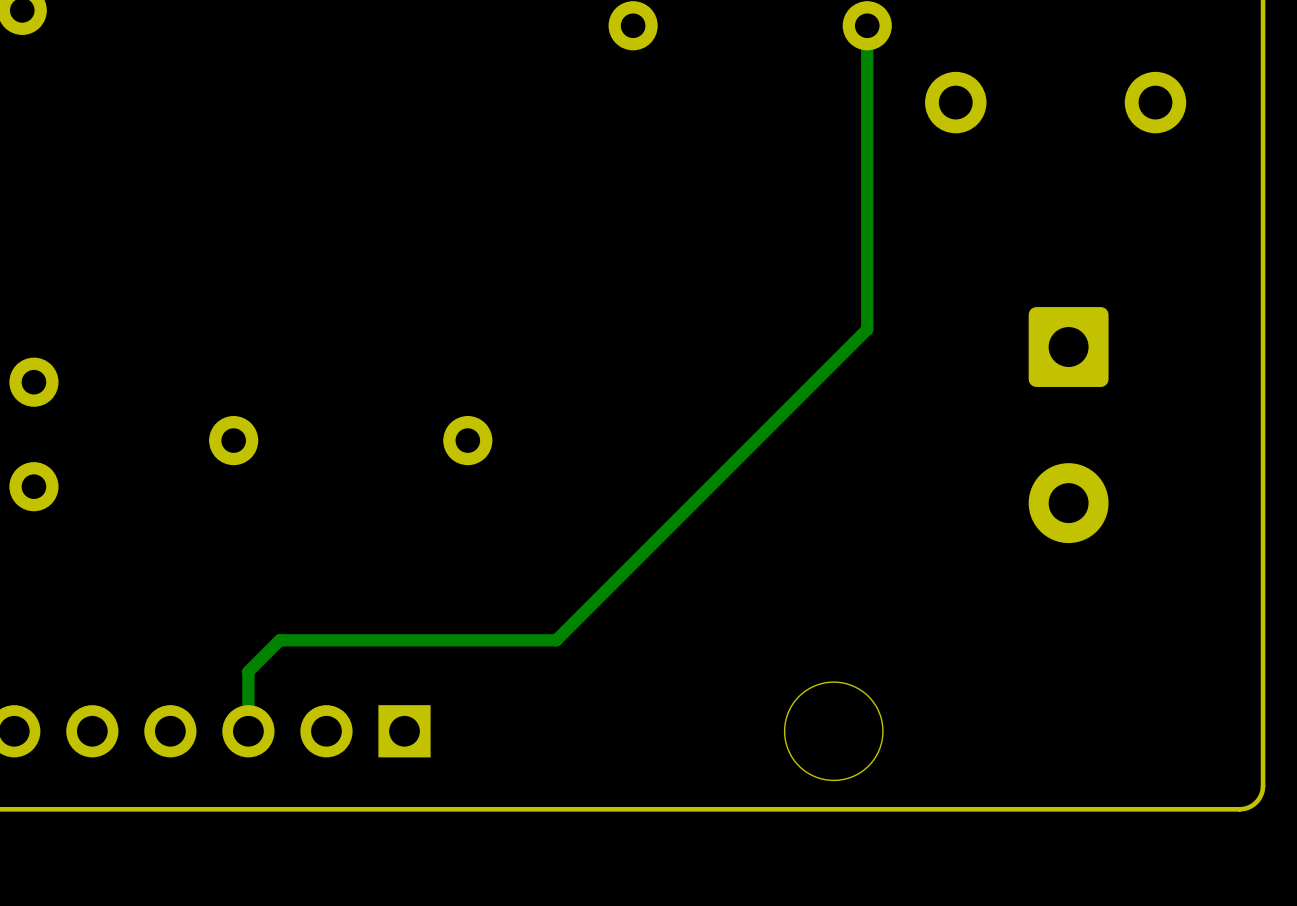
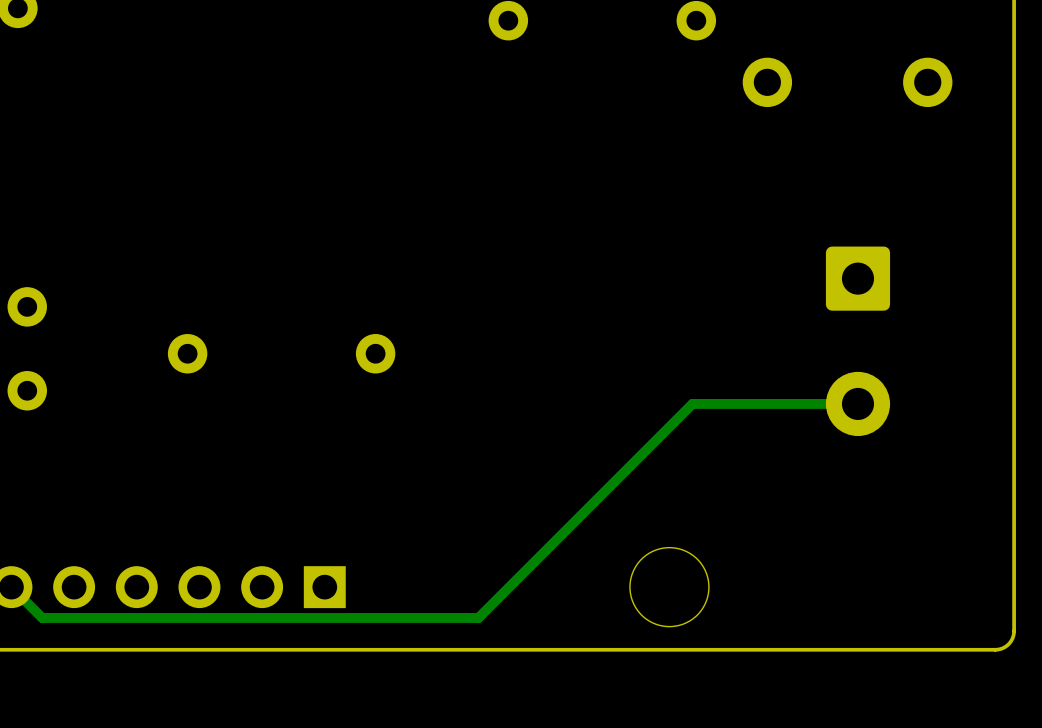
track: (867, 25) (867, 329) (556, 640) (279, 640) (248, 671) (248, 731) -> none
track: none -> (857, 403) (692, 403) (478, 617) (42, 617) (11, 587)

